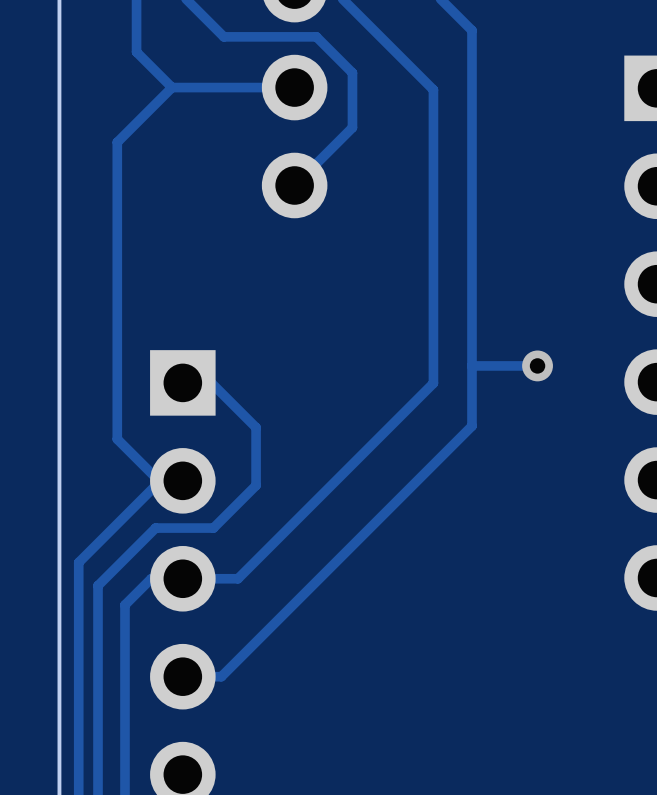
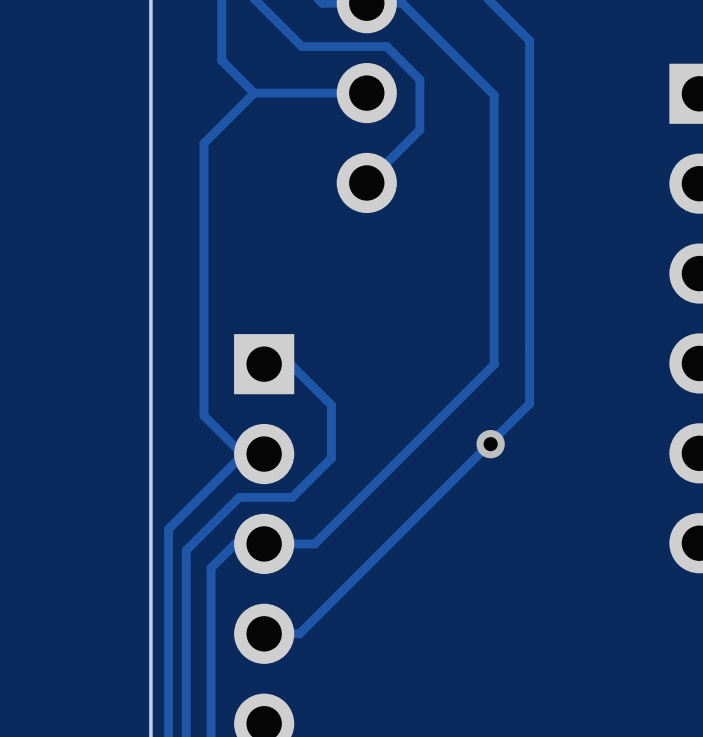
track: (537, 365) (471, 365) -> none
via position: (537, 365) -> (490, 444)

